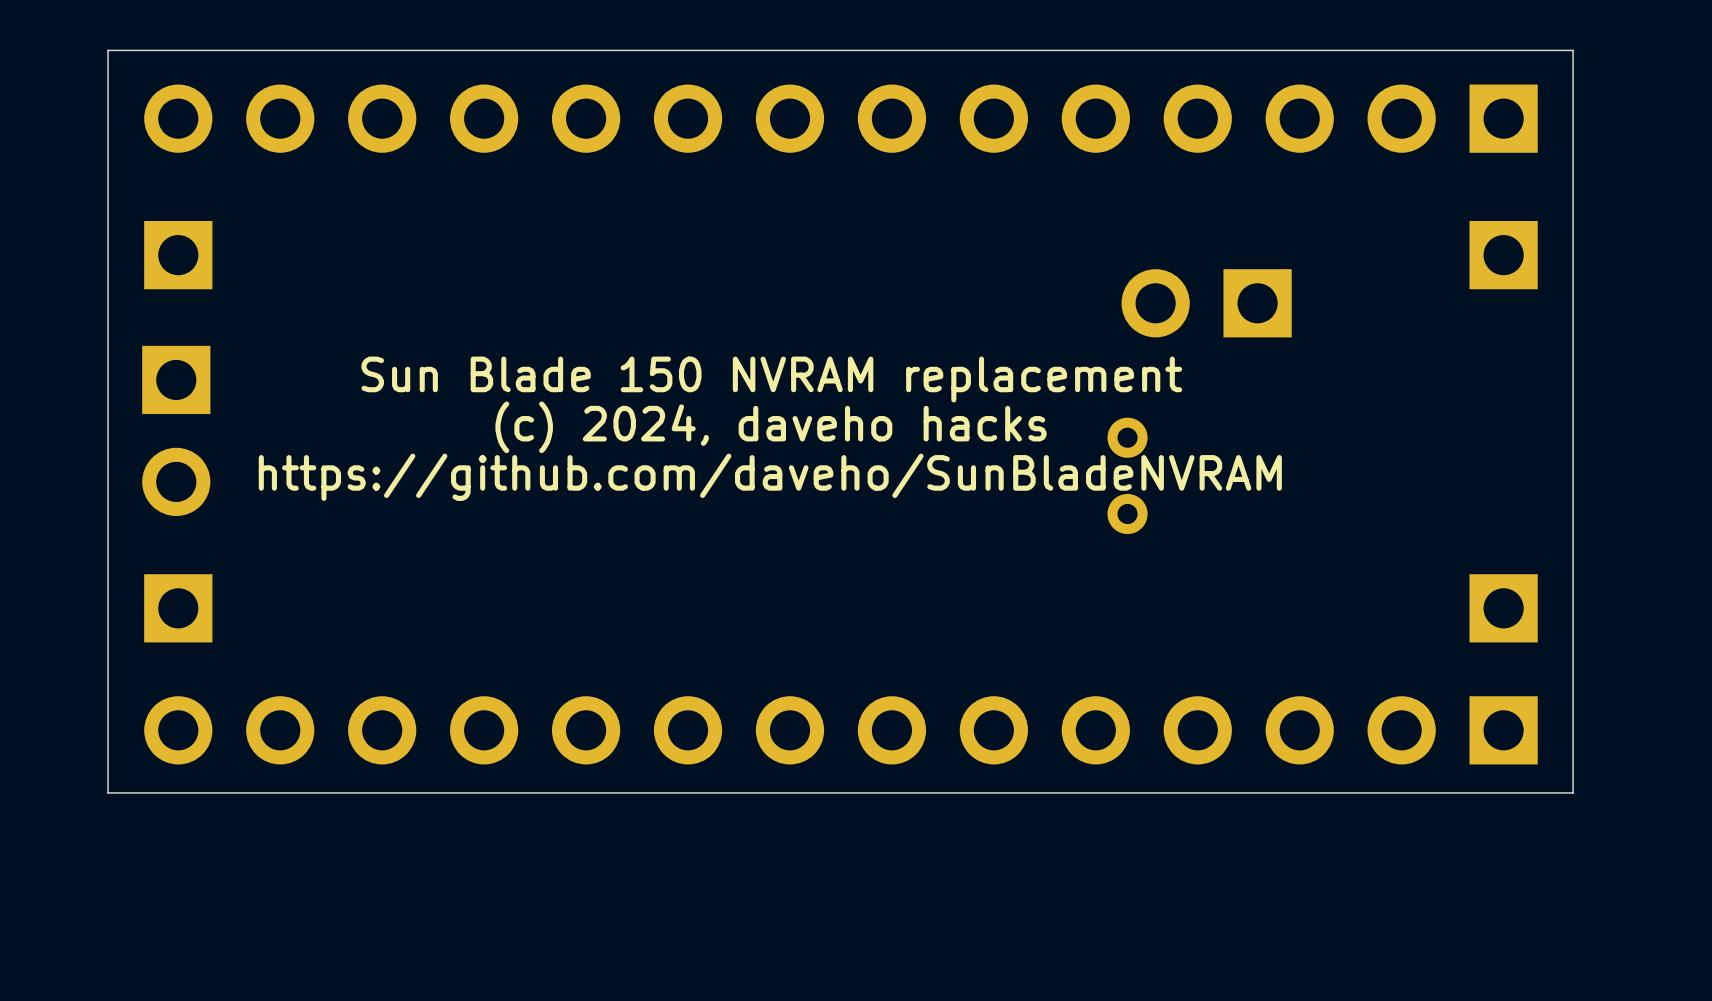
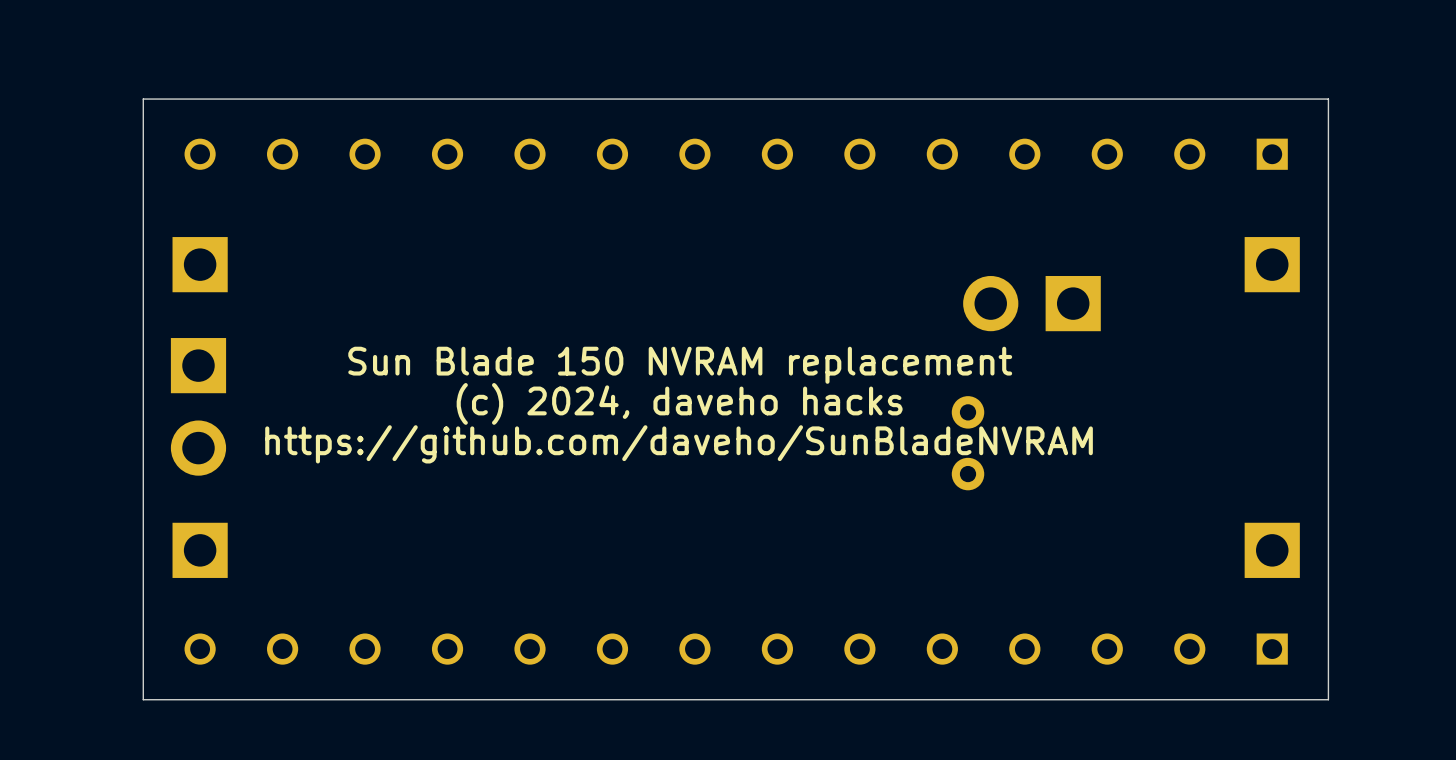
part footprint: [144, 84, 1538, 153] -> [184, 138, 1288, 170]
part footprint: [144, 696, 1538, 765] -> [184, 633, 1288, 665]

